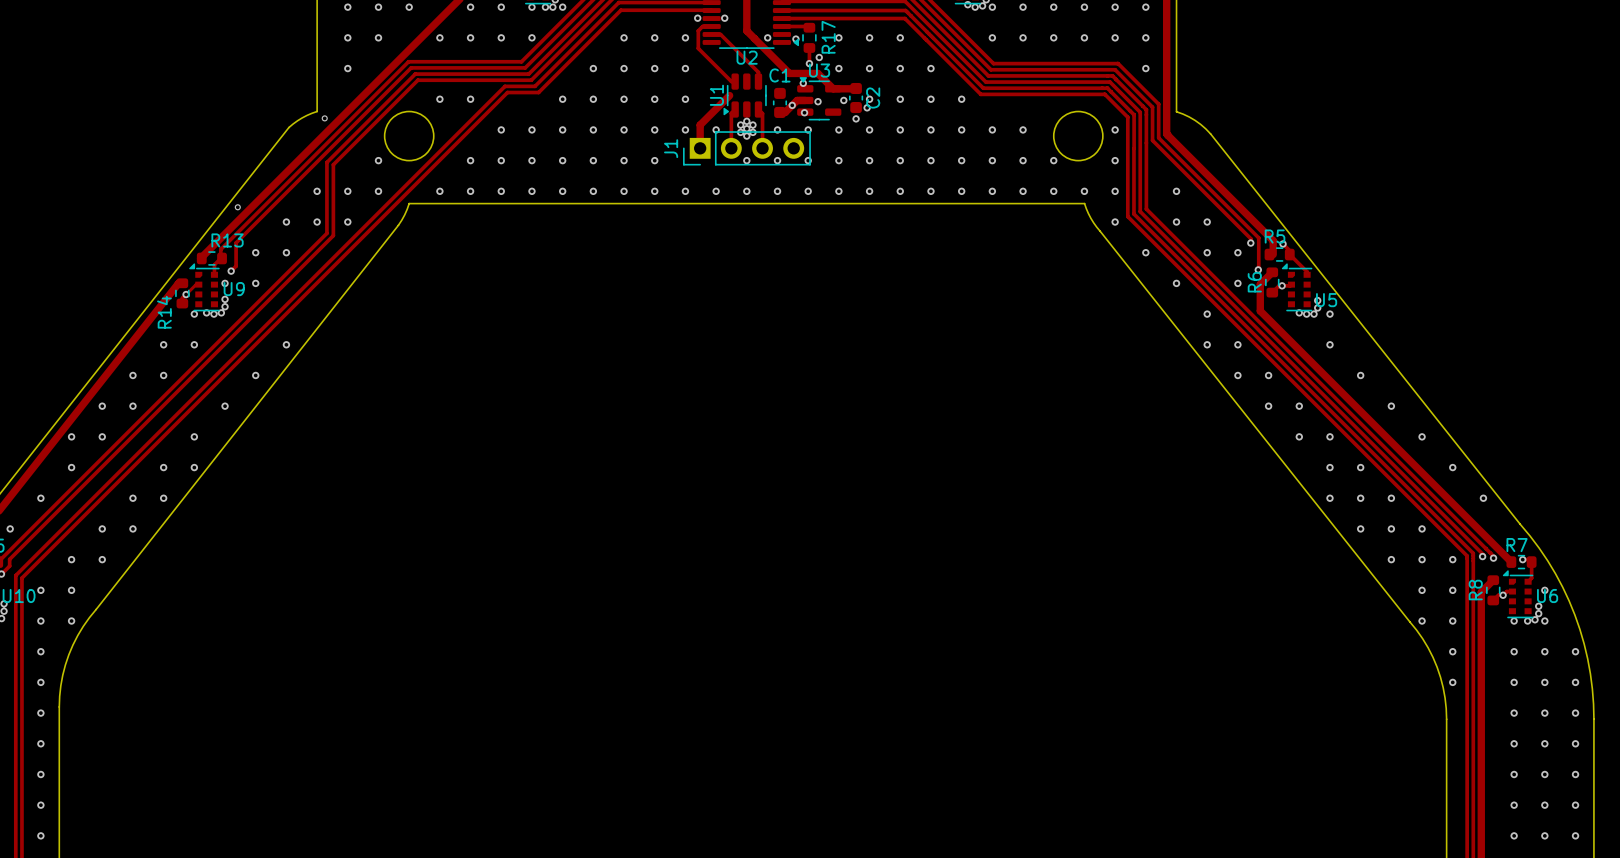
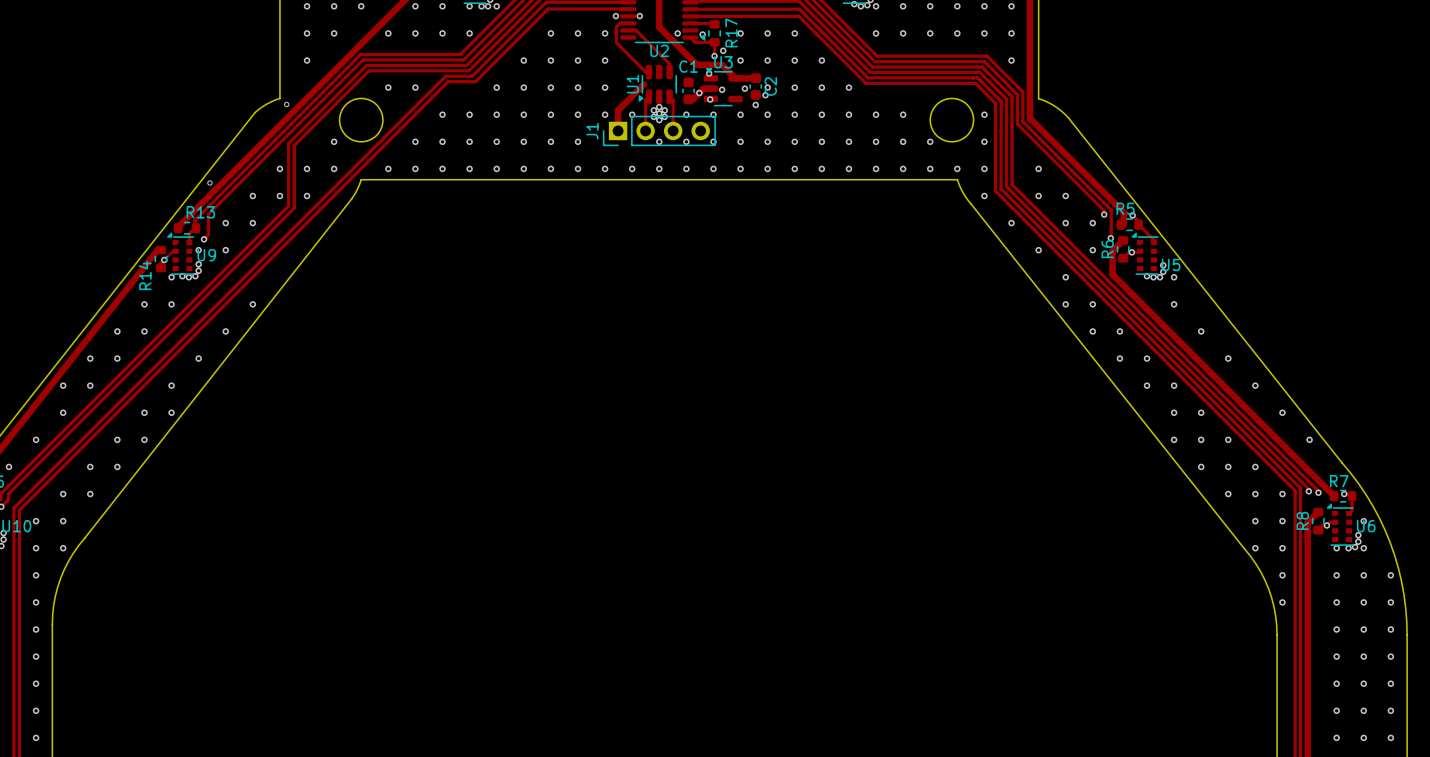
track: none -> (690, 37) (695, 42) (714, 42)

